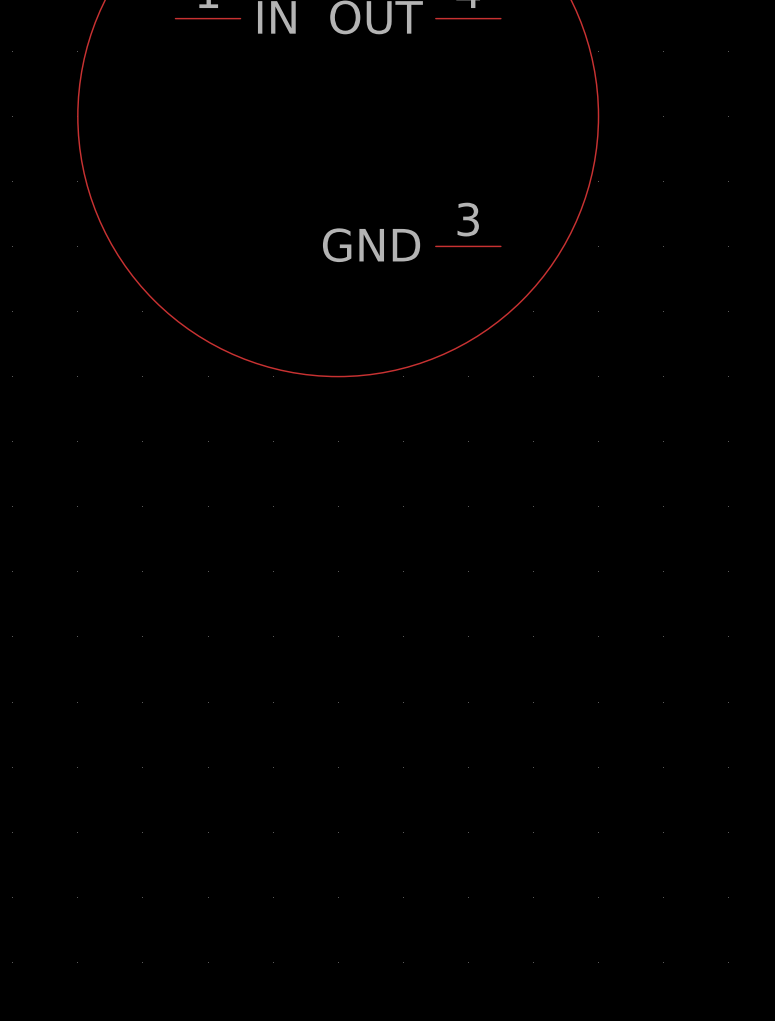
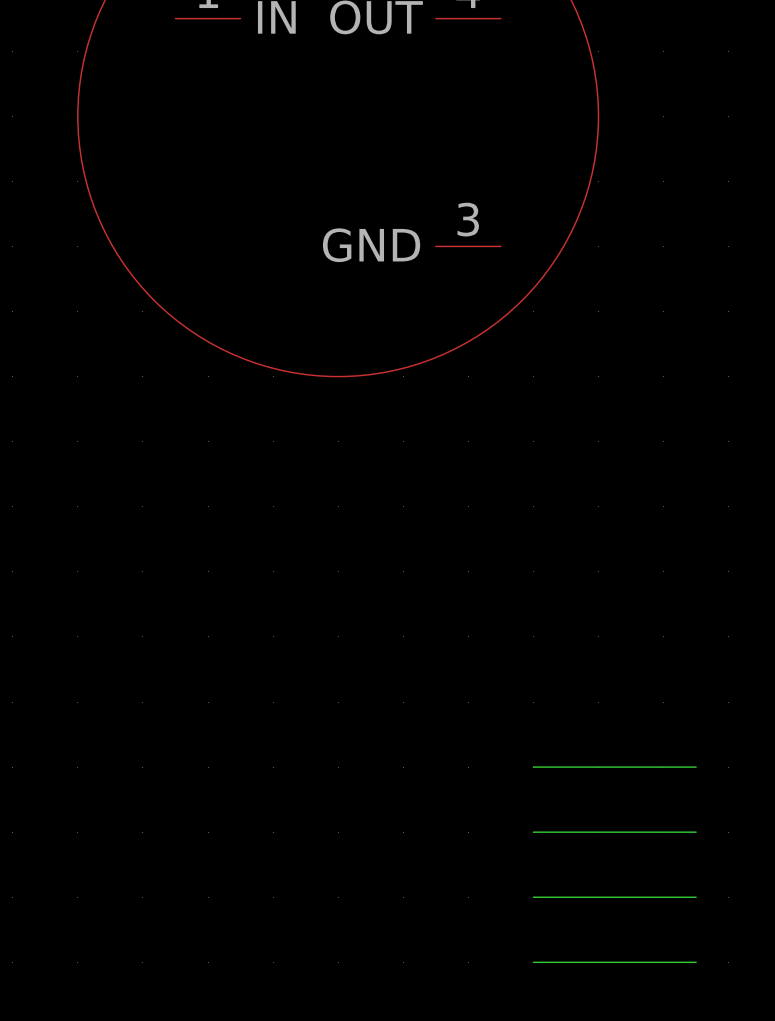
wire: none -> (533, 767) (696, 767)
wire: none -> (533, 832) (696, 832)
wire: none -> (533, 897) (696, 897)
wire: none -> (533, 962) (696, 962)

